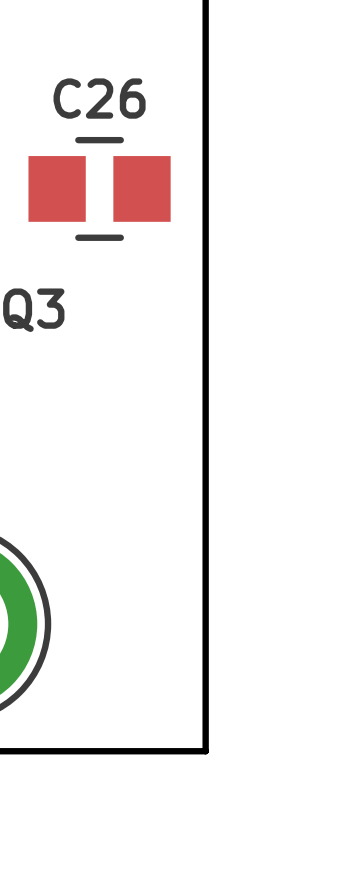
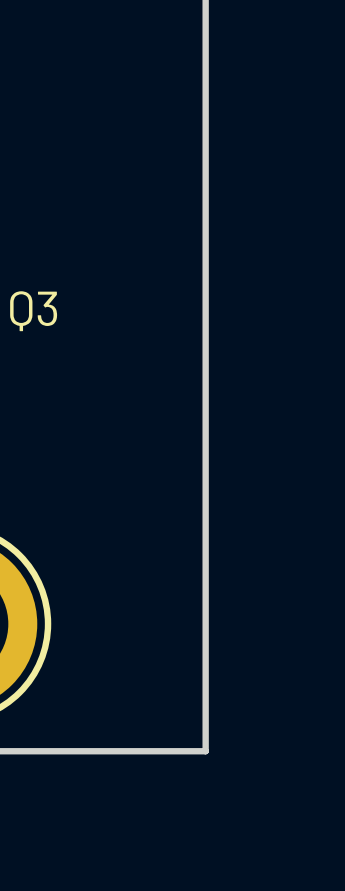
C26: (99, 188) -> none

